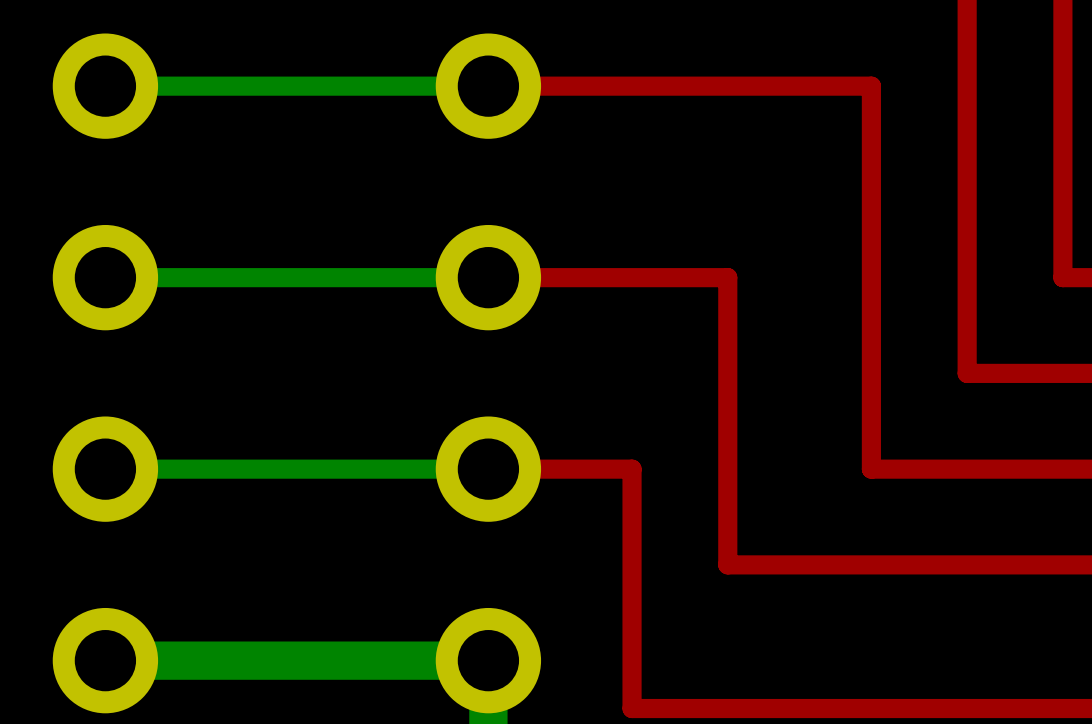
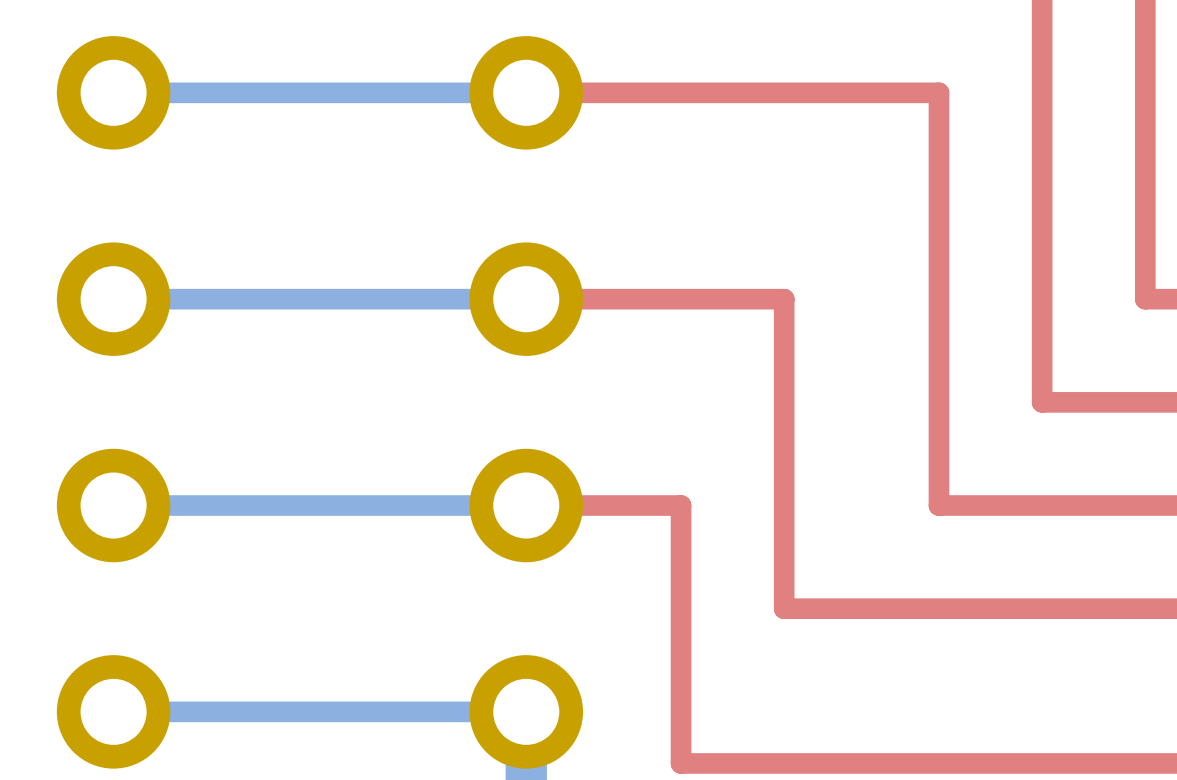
bottom track width: thick (488, 660) (105, 660) -> thin (526, 711) (113, 711)

